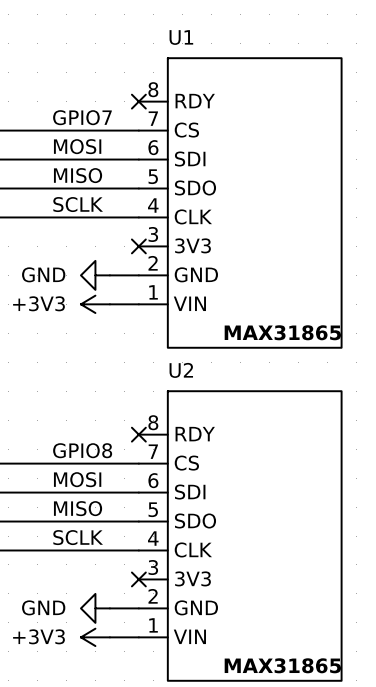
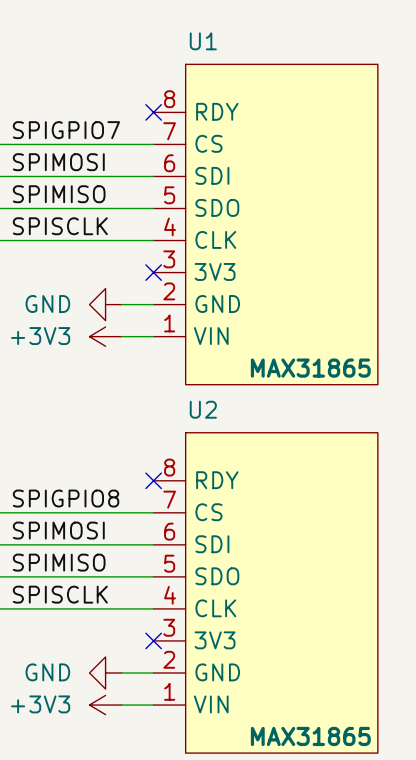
label: GPIO7 (82, 117) -> SPIGPIO7 (66, 130)
label: MOSI (77, 146) -> SPIMOSI (58, 162)
label: MISO (78, 175) -> SPIMISO (59, 194)
label: SCLK (78, 204) -> SPISCLK (60, 226)
label: GPIO8 (82, 450) -> SPIGPIO8 (66, 498)
label: MOSI (77, 479) -> SPIMOSI (58, 530)
label: MISO (78, 508) -> SPIMISO (59, 562)
label: SCLK (78, 537) -> SPISCLK (60, 594)

